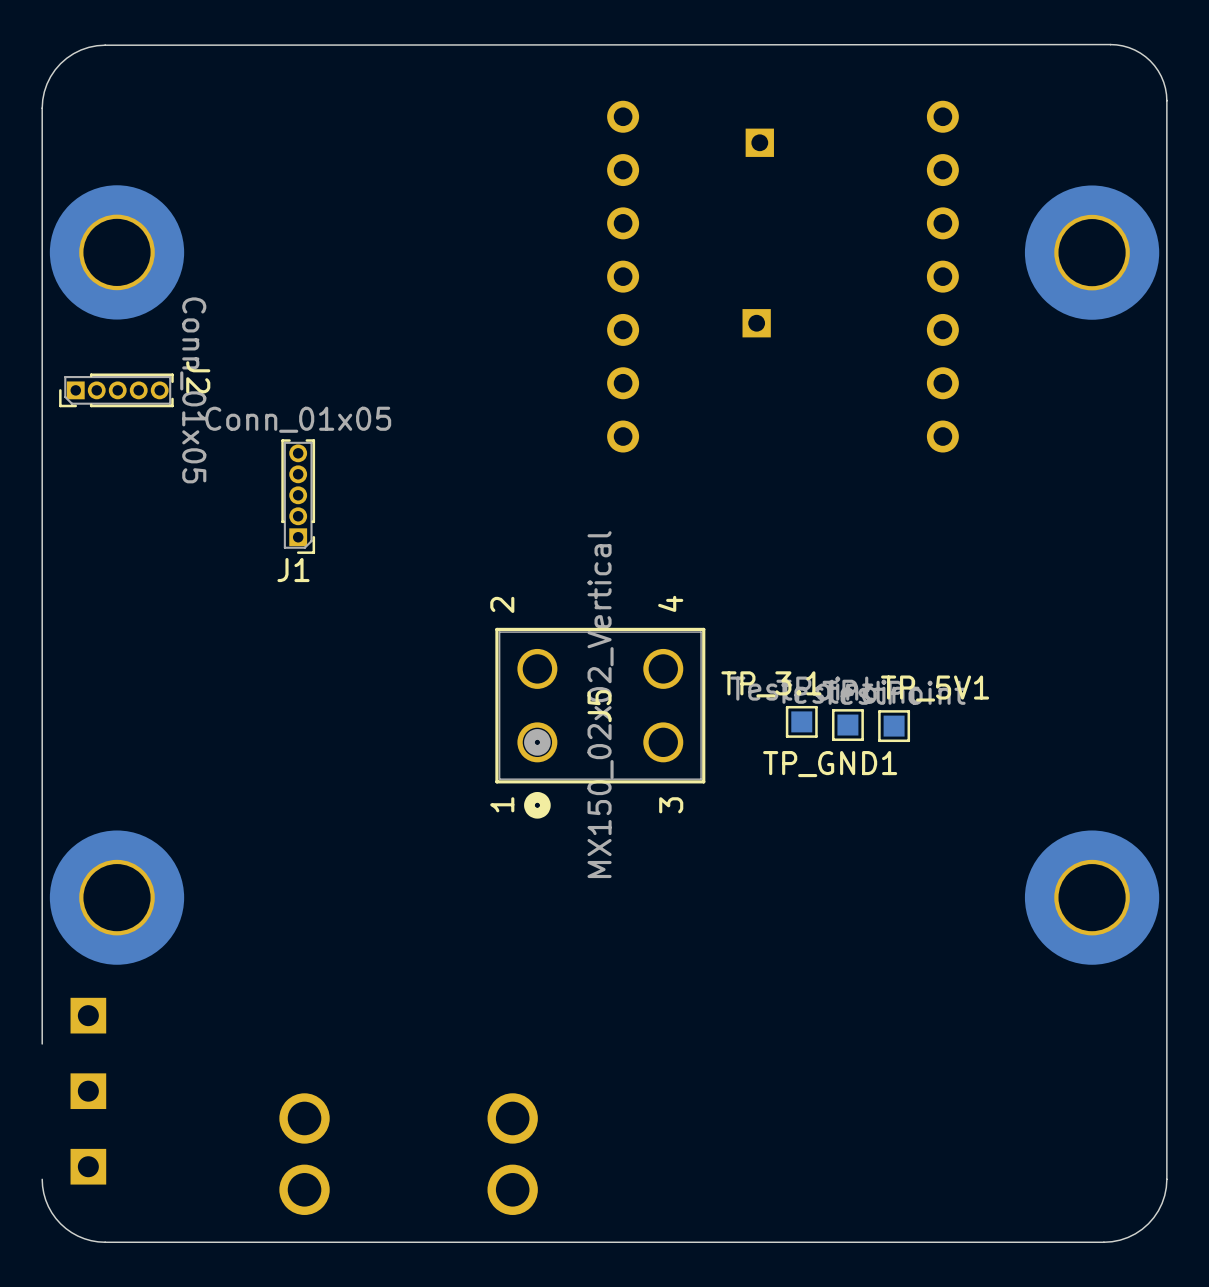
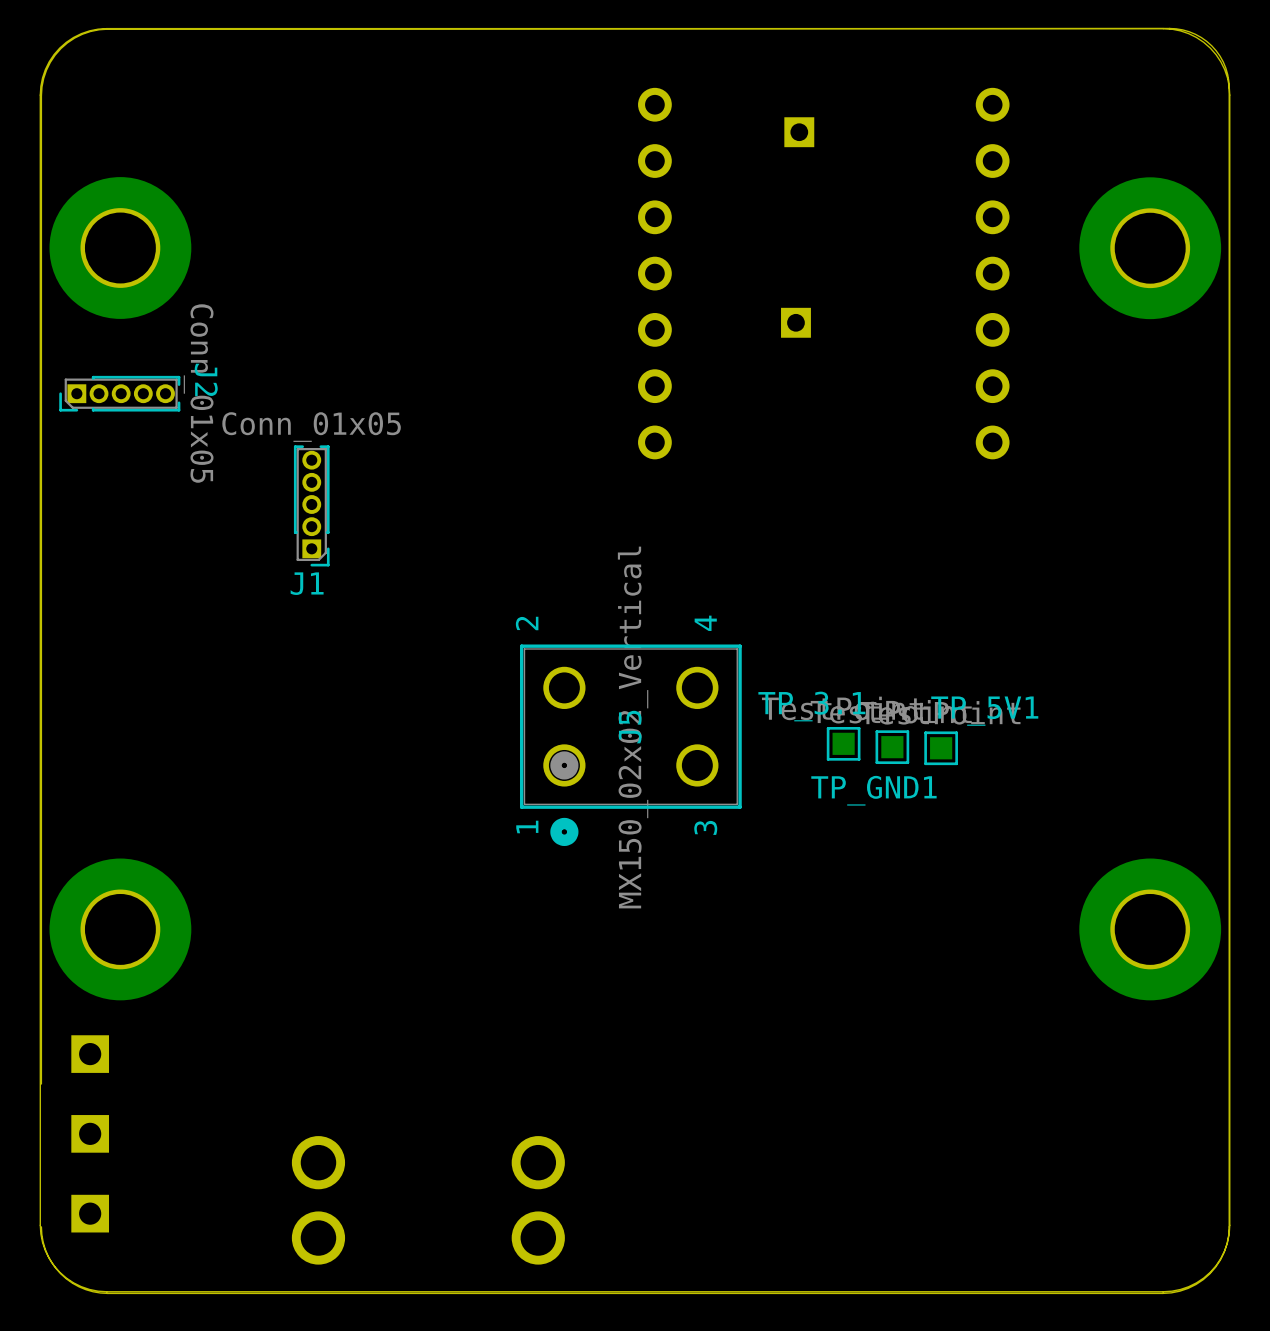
board edge: none -> (1163, 28) (106, 28) (81, 33) (59, 48) (45, 69) (40, 95) (40, 1225) (45, 1250) (59, 1272) (81, 1286) (106, 1291) (1163, 1291) (1188, 1286) (1210, 1272) (1224, 1250) (1229, 1225) (1229, 95) (1224, 69) (1210, 48) (1188, 33) (1163, 28)

